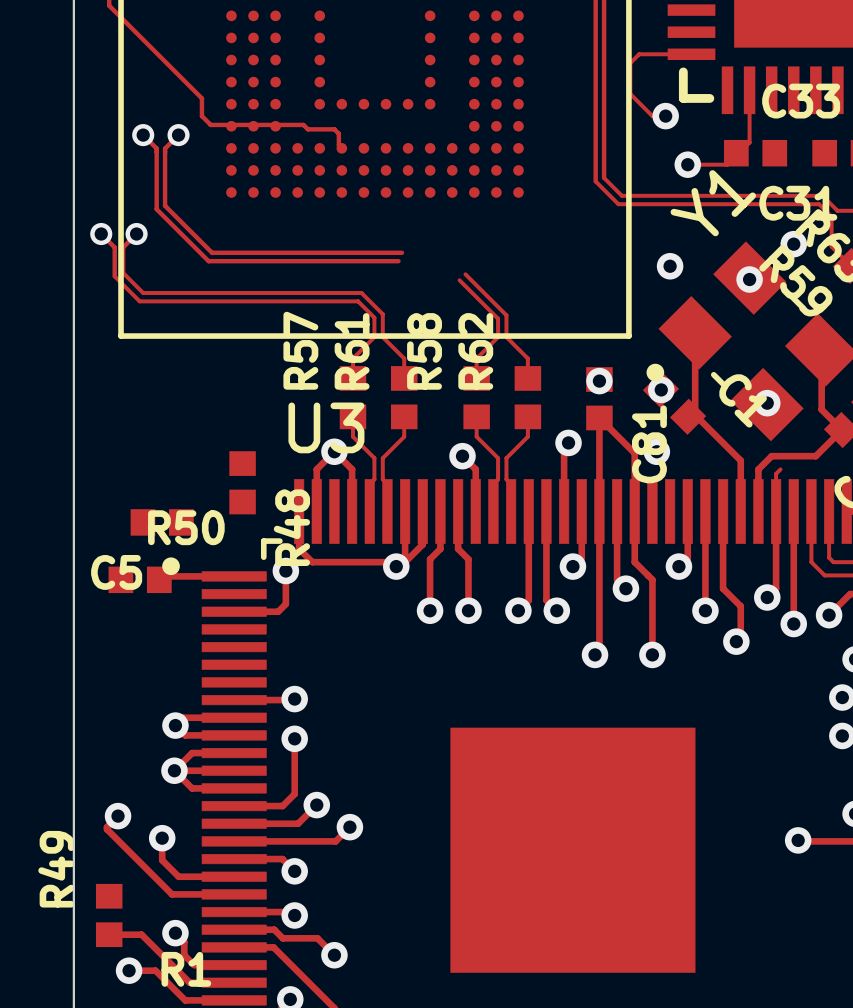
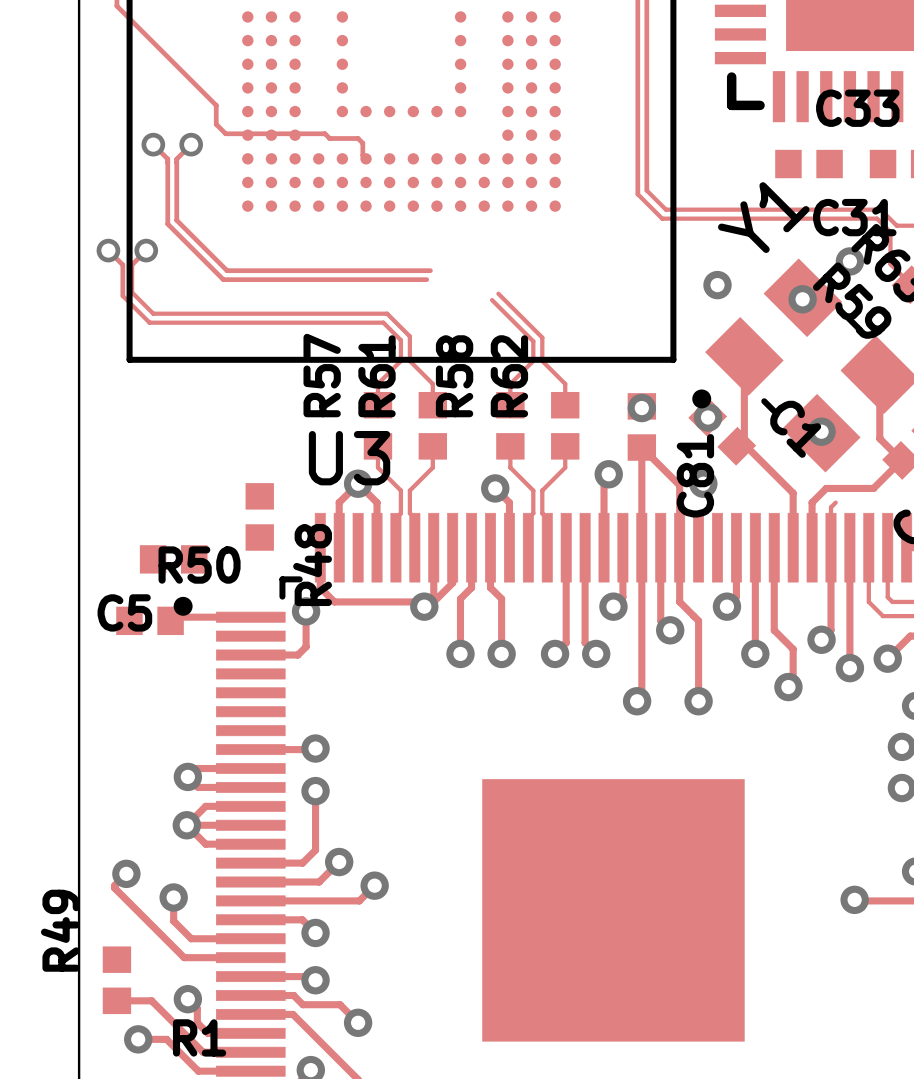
track: (691, 54) (639, 54) (630, 63) (630, 94) (652, 116) (665, 116) -> none
track: (749, 90) (749, 142) (727, 164) (687, 164) -> none
via: (665, 116) -> none
via: (687, 164) -> none

